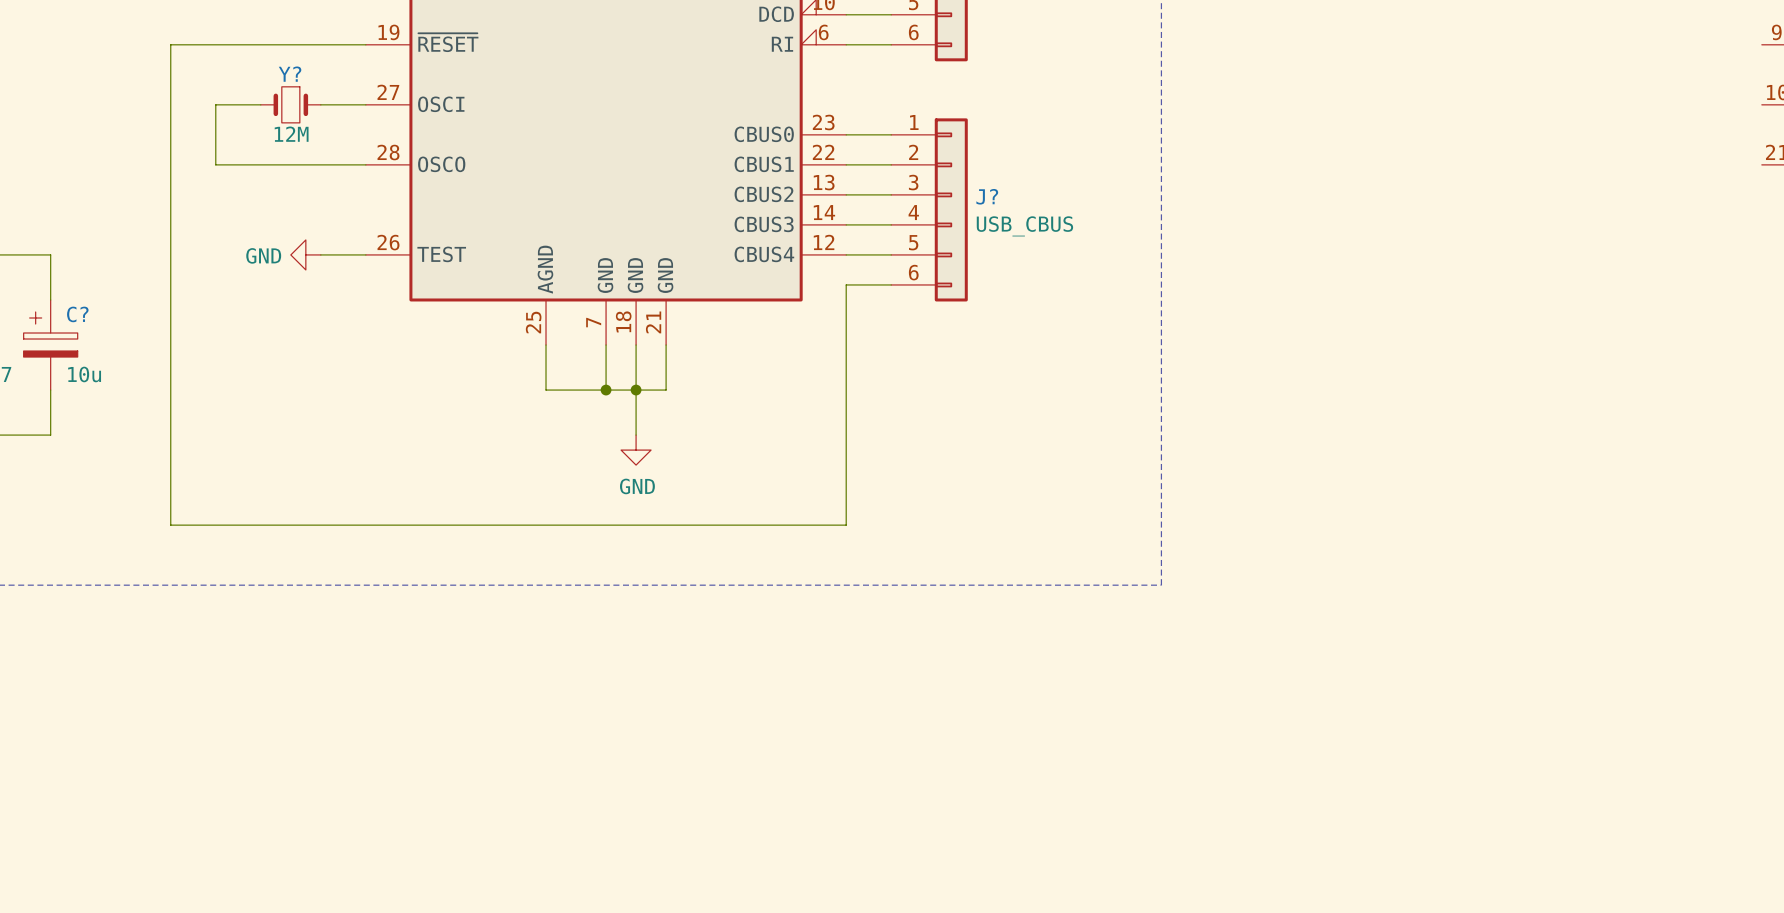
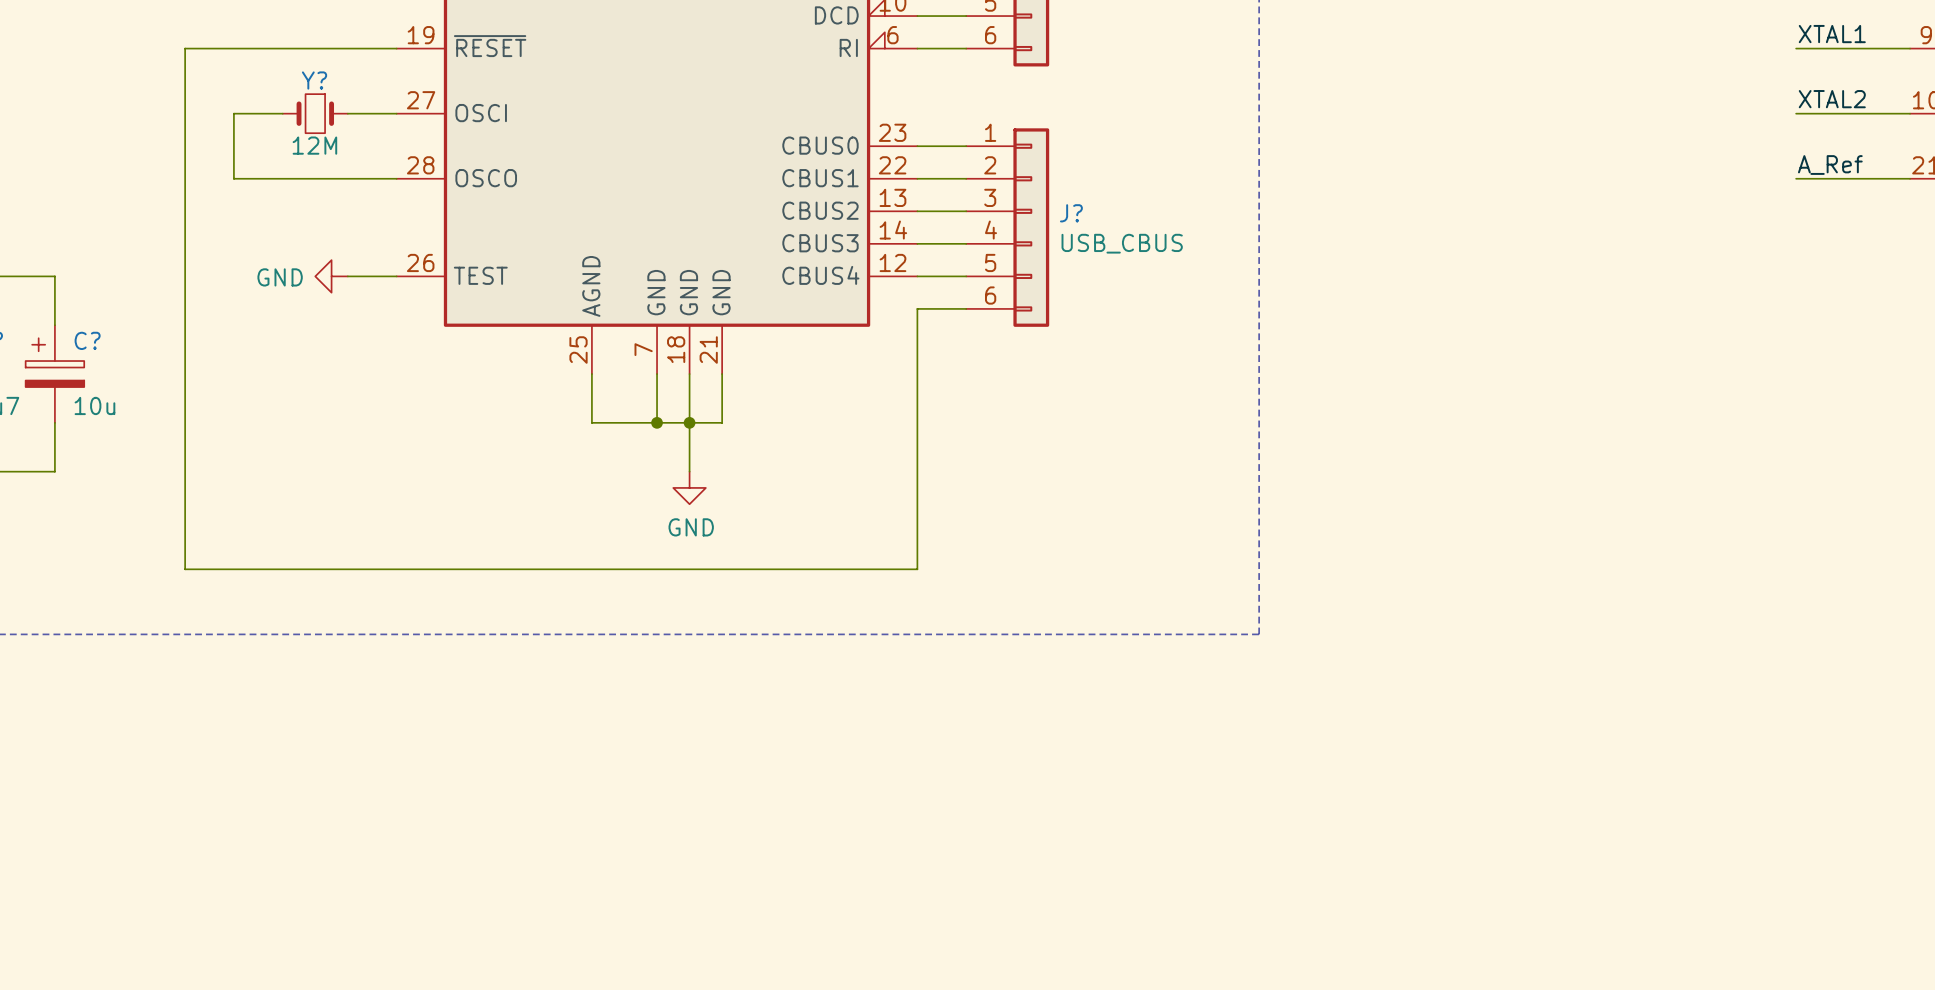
label: none -> XTAL1 (1832, 34)
wire: none -> (1796, 48) (1910, 48)
label: none -> XTAL2 (1832, 99)
wire: none -> (1796, 113) (1910, 113)
label: none -> A_Ref (1830, 165)
wire: none -> (1796, 178) (1910, 178)

